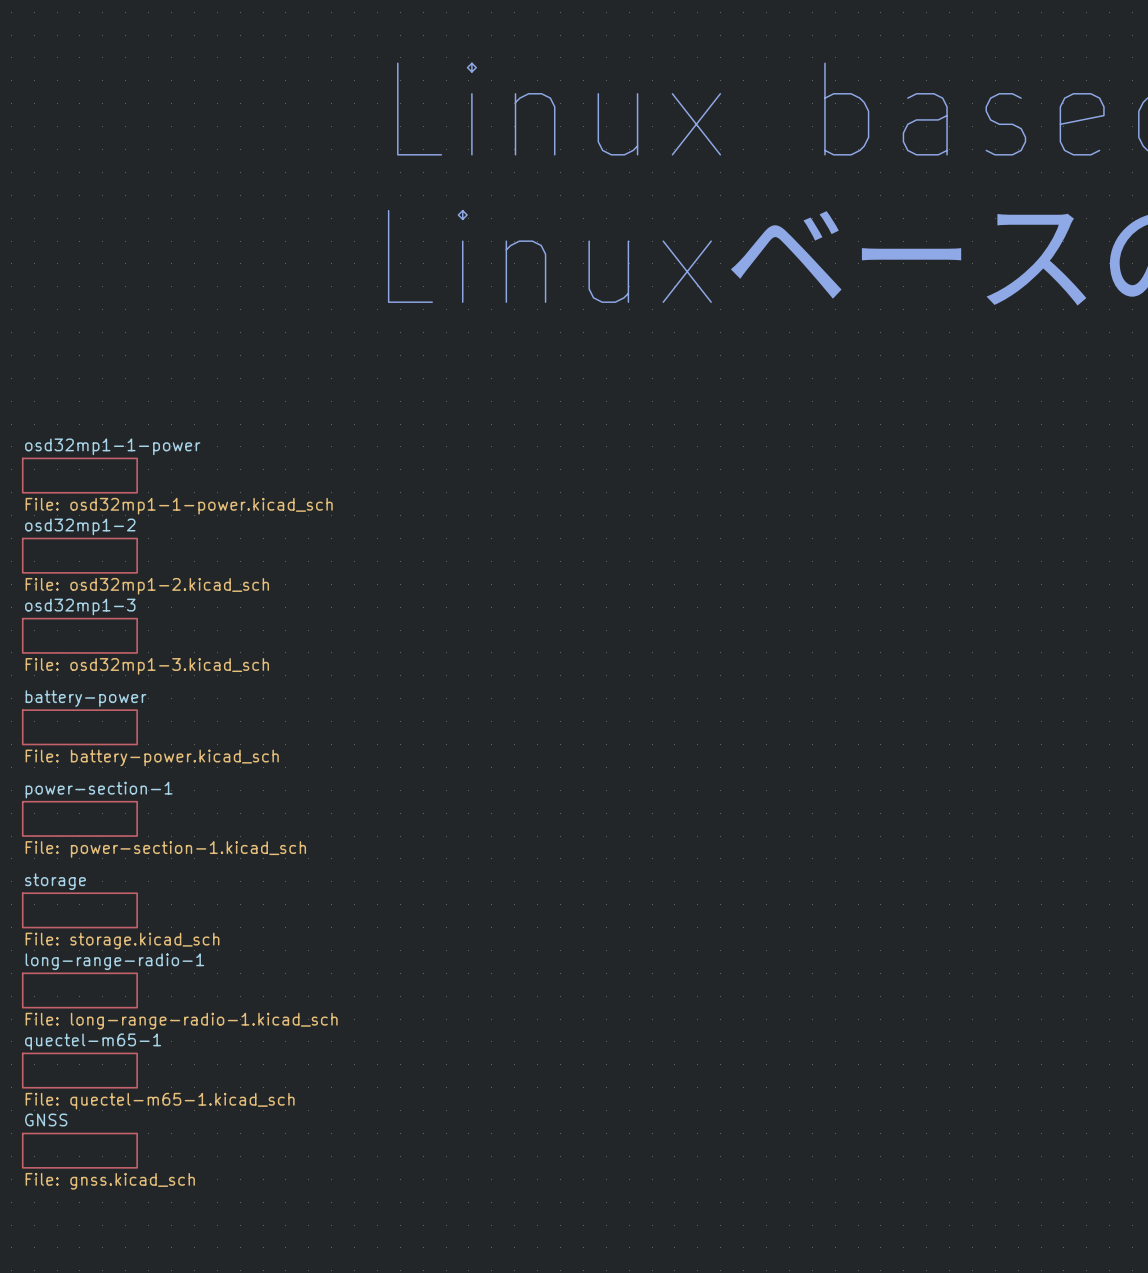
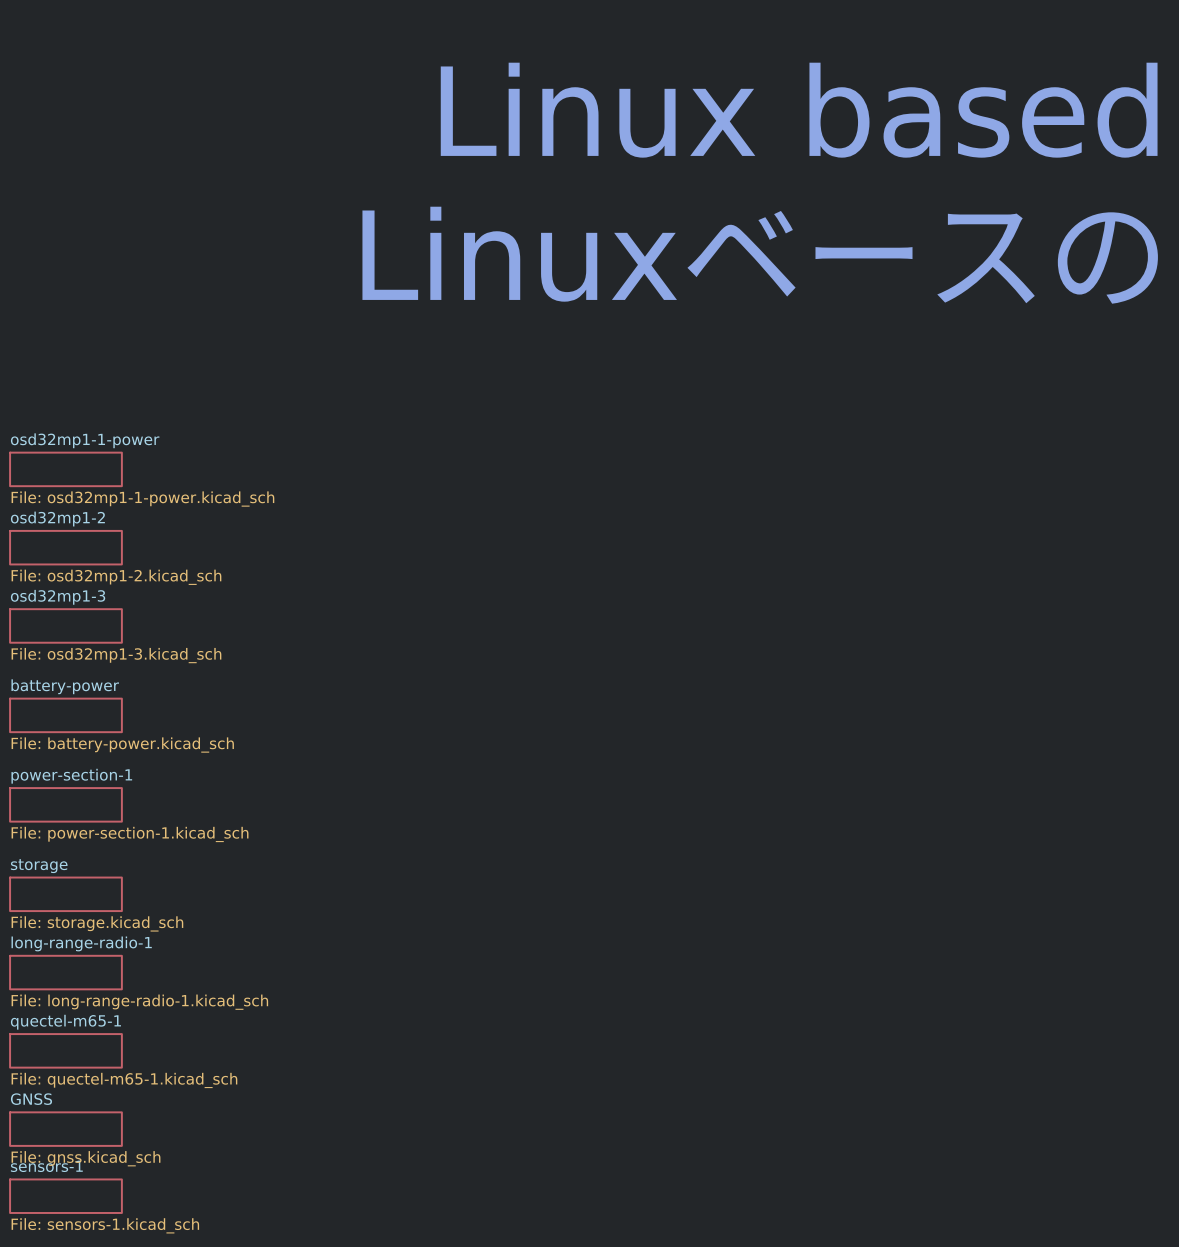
sheet sensors-1: none -> File: sensors-1.kicad_sch (65, 1196)

